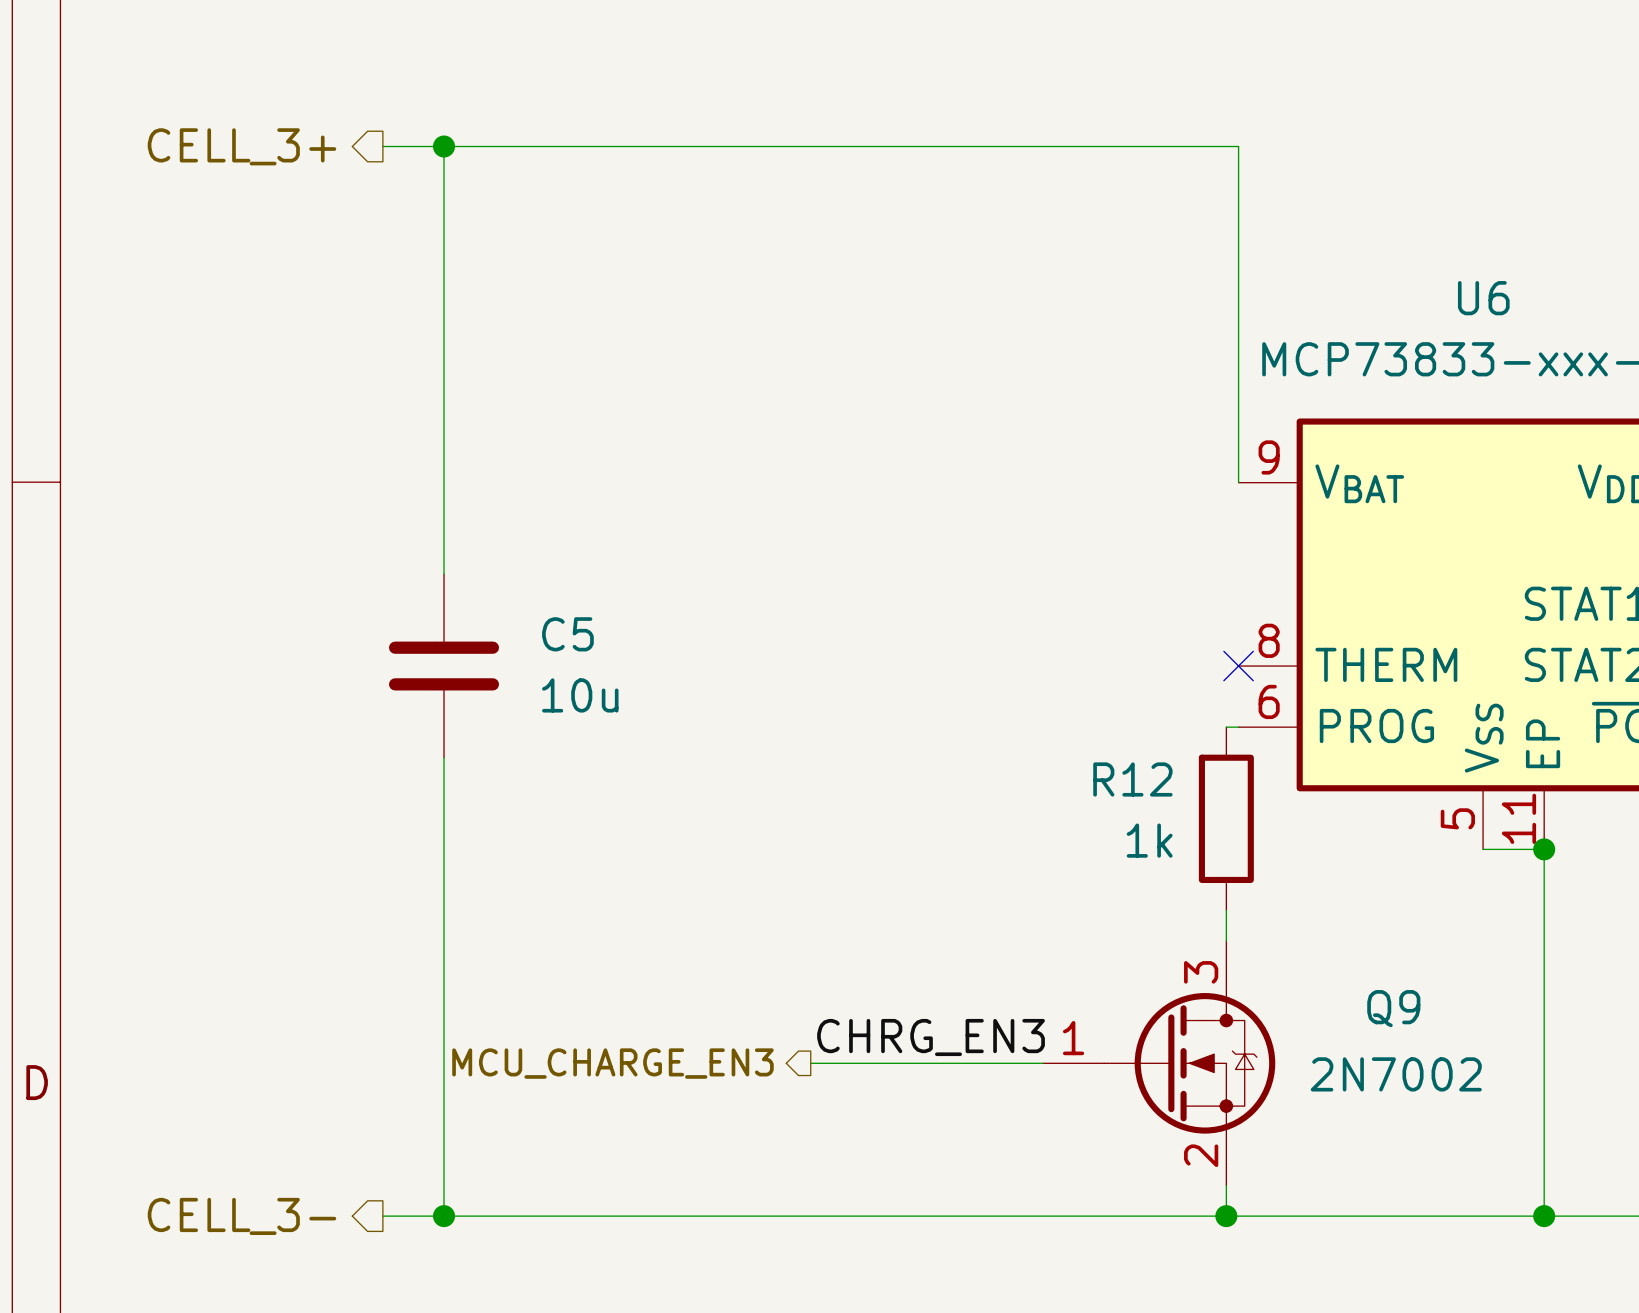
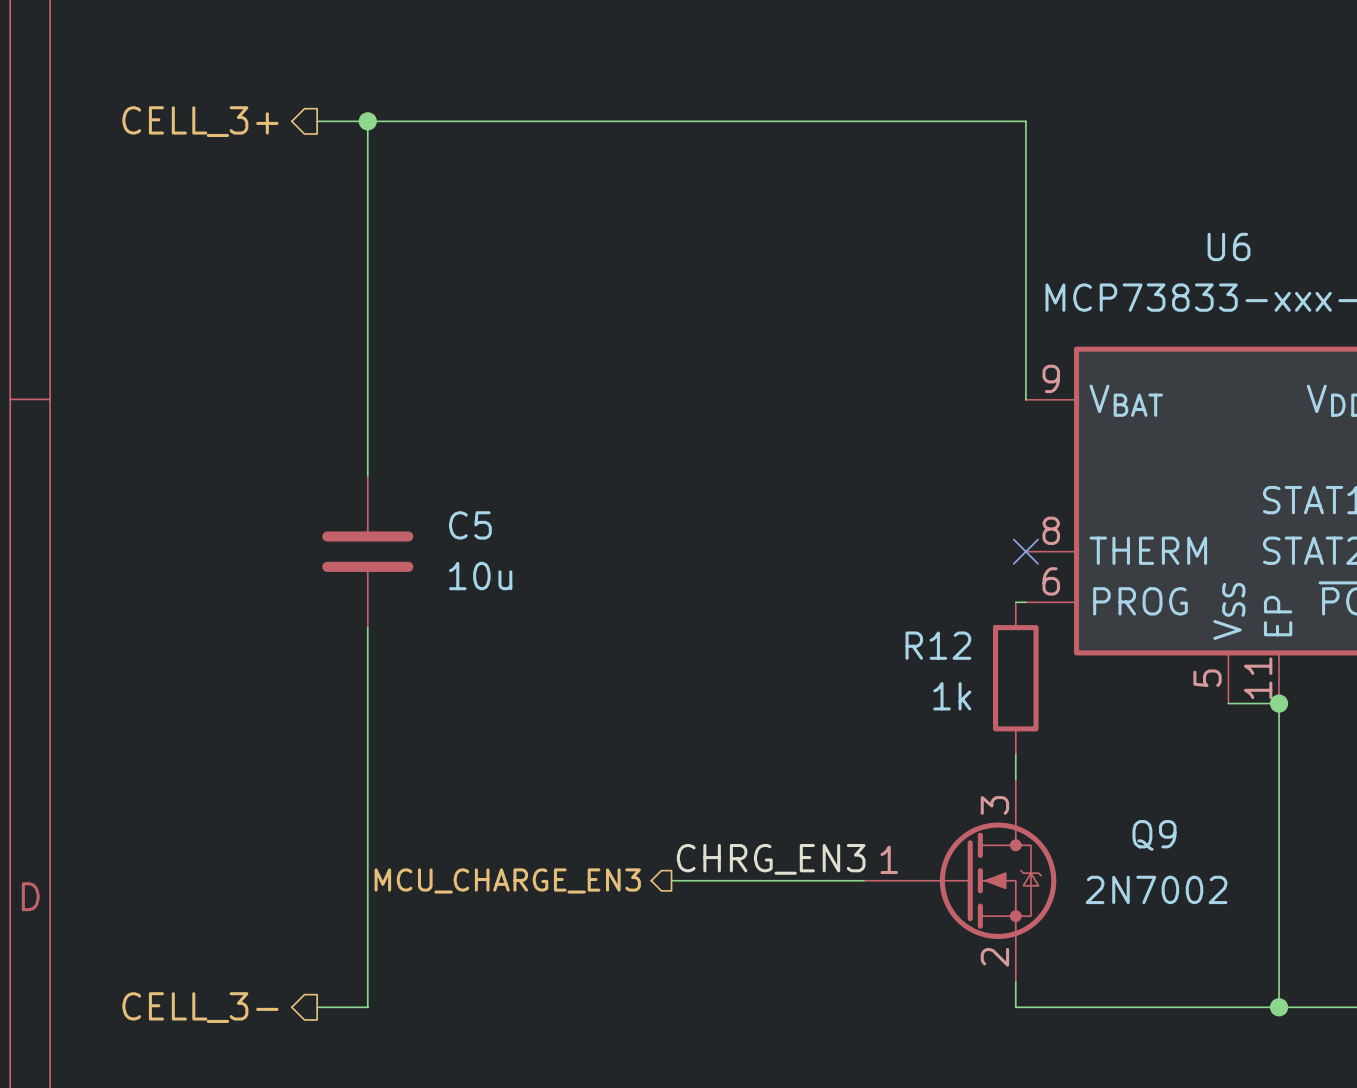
wire: (444, 1216) (1226, 1216) -> none
junction: (444, 1216) -> none
junction: (1226, 1216) -> none

